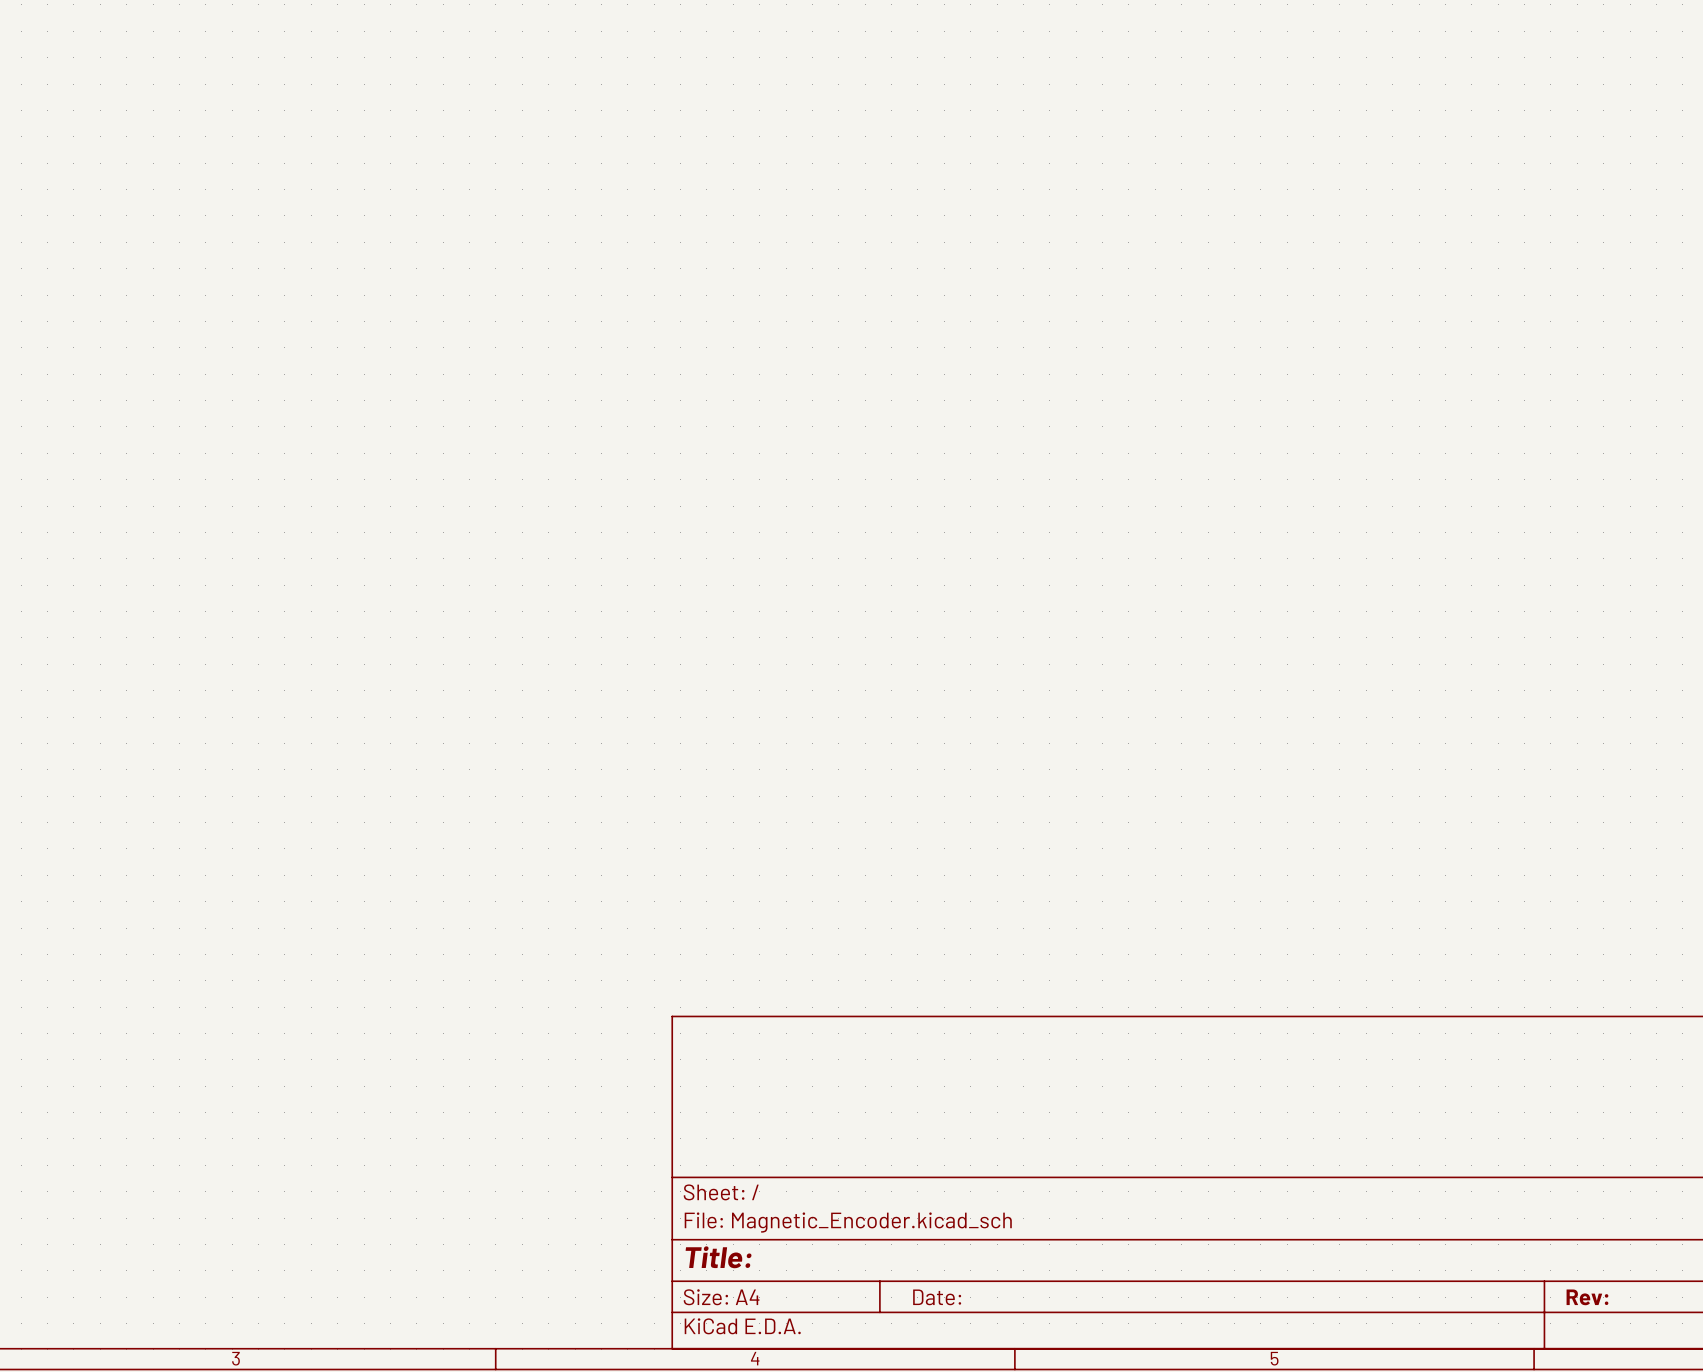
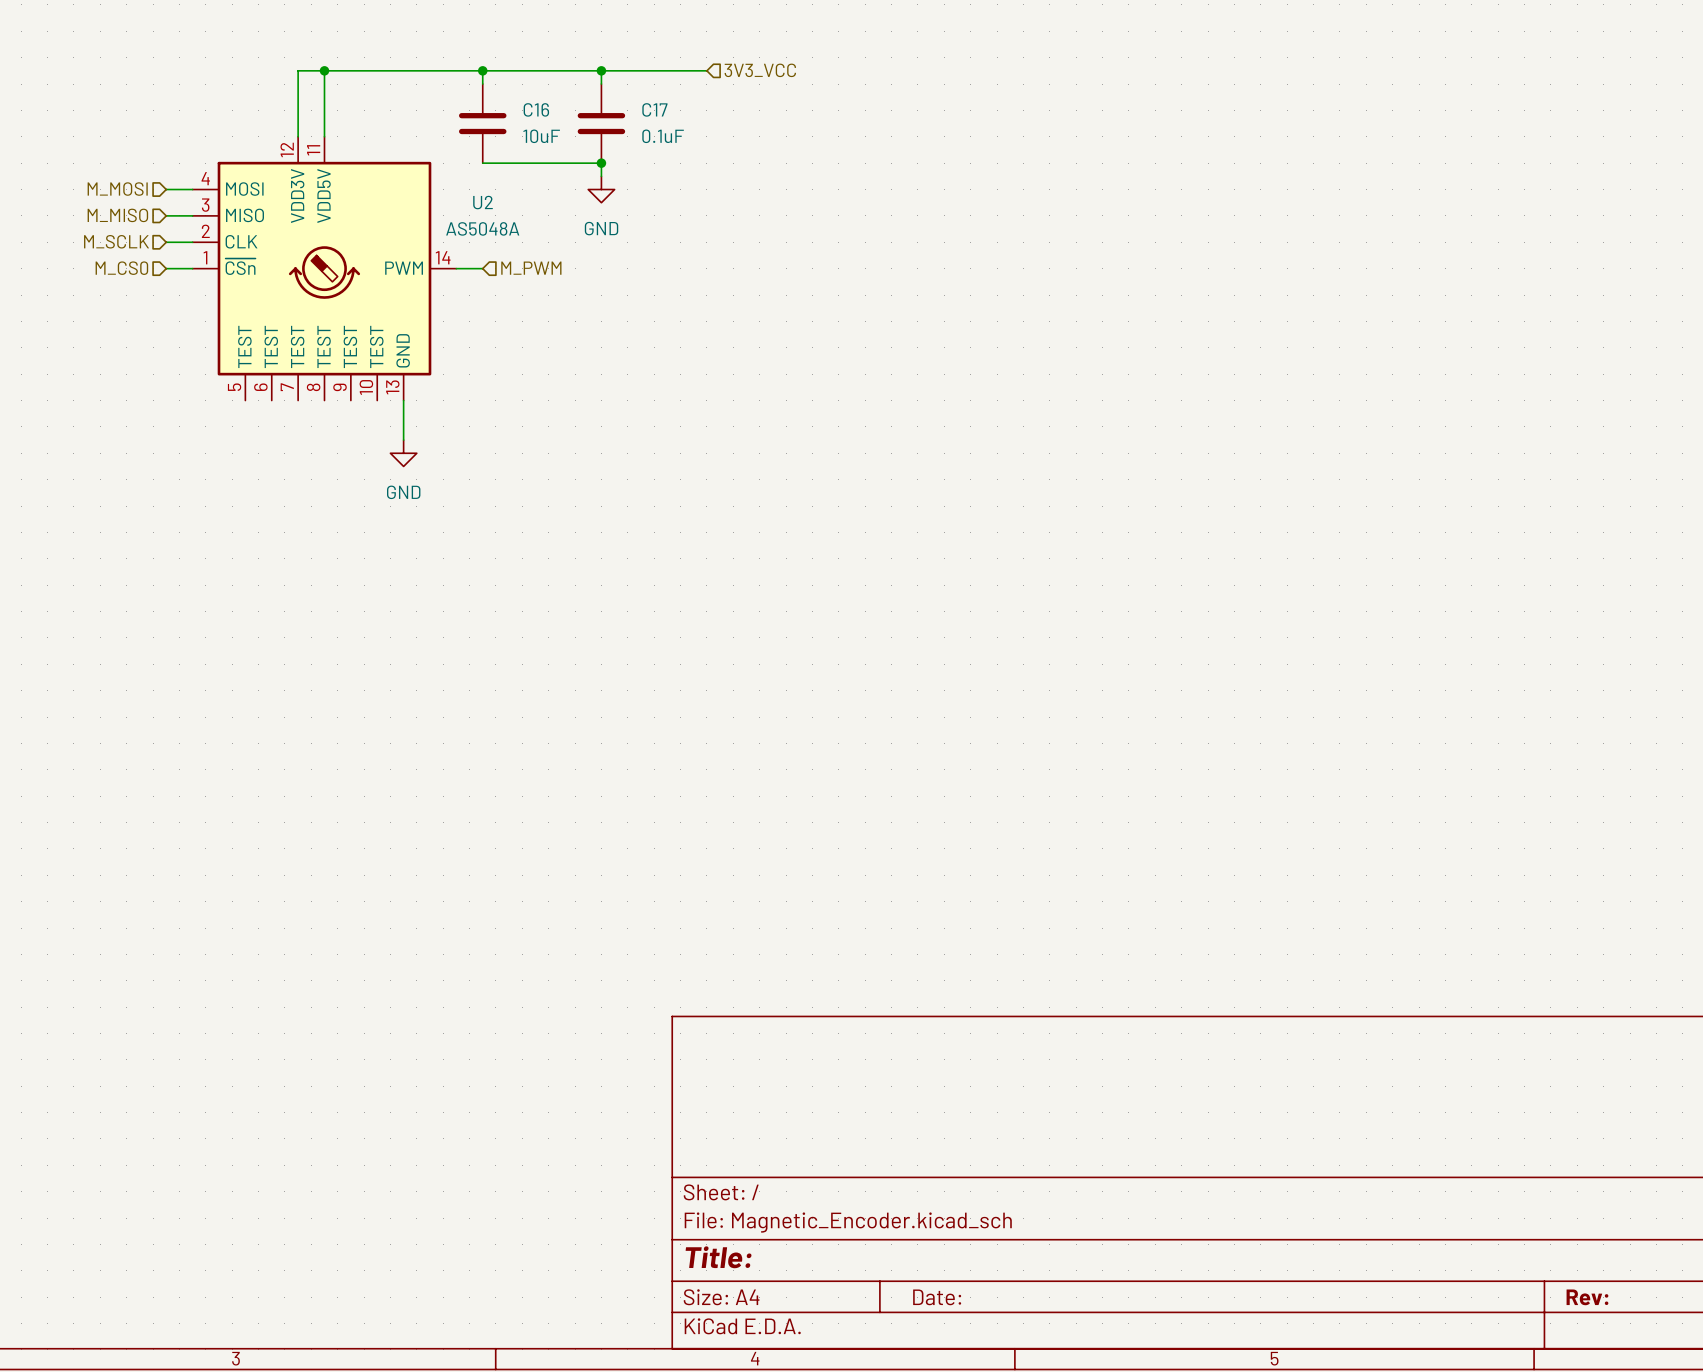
wire: none -> (324, 70) (324, 136)
junction: none -> (324, 70)
wire: none -> (482, 70) (482, 84)
junction: none -> (482, 70)
wire: none -> (601, 70) (601, 84)
junction: none -> (601, 70)
wire: none -> (706, 70) (298, 70) (298, 136)
hierarchical label: none -> 3V3_VCC (760, 70)
C16: none -> 10uF (482, 123)
C17: none -> 0.1uF (601, 123)
wire: none -> (482, 163) (601, 163) (601, 176)
junction: none -> (601, 163)
hierarchical label: none -> M_MOSI (117, 189)
wire: none -> (166, 189) (192, 189)
power symbol: none -> GND (601, 189)
hierarchical label: none -> M_MISO (117, 215)
wire: none -> (166, 215) (192, 215)
hierarchical label: none -> M_SCLK (116, 241)
wire: none -> (166, 242) (192, 242)
hierarchical label: none -> M_CS0 (121, 268)
wire: none -> (166, 268) (192, 268)
U2: none -> AS5048A (324, 268)
wire: none -> (456, 268) (482, 268)
hierarchical label: none -> M_PWM (531, 268)
wire: none -> (403, 400) (403, 440)
power symbol: none -> GND (403, 453)

